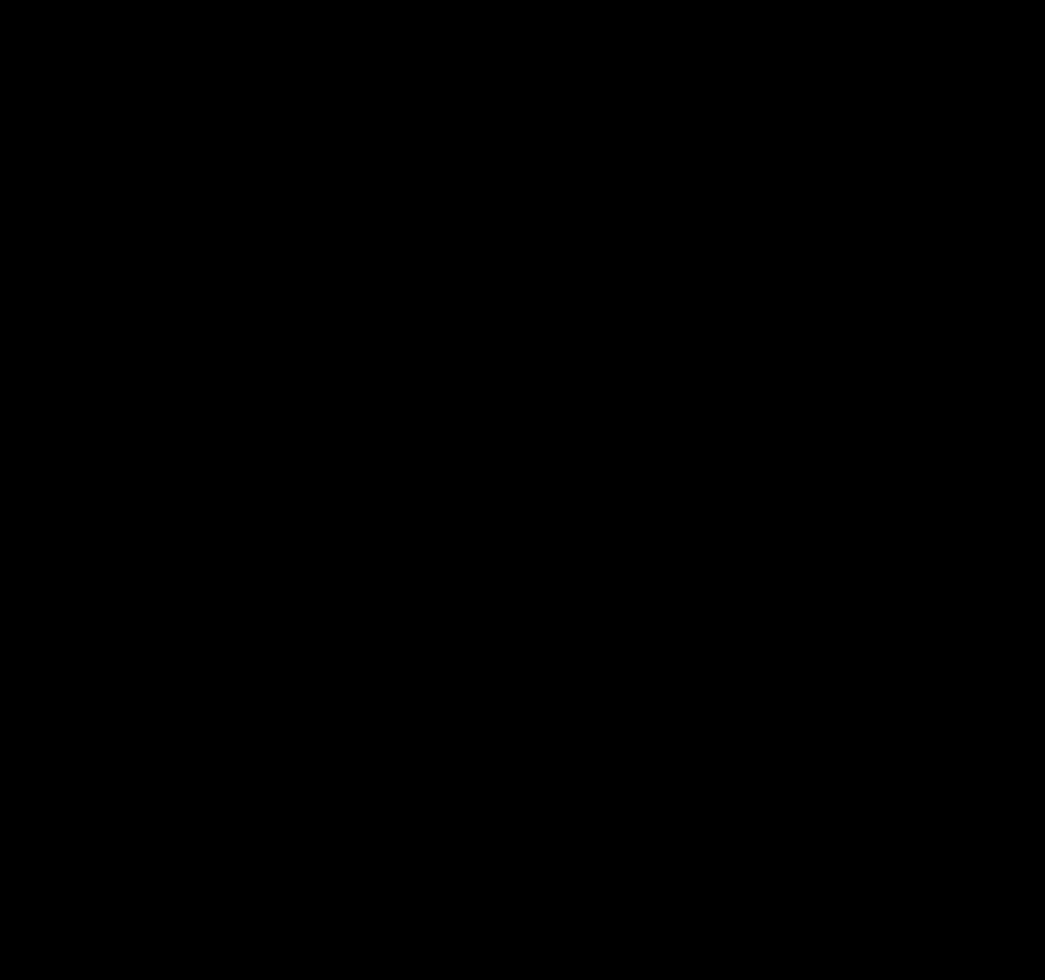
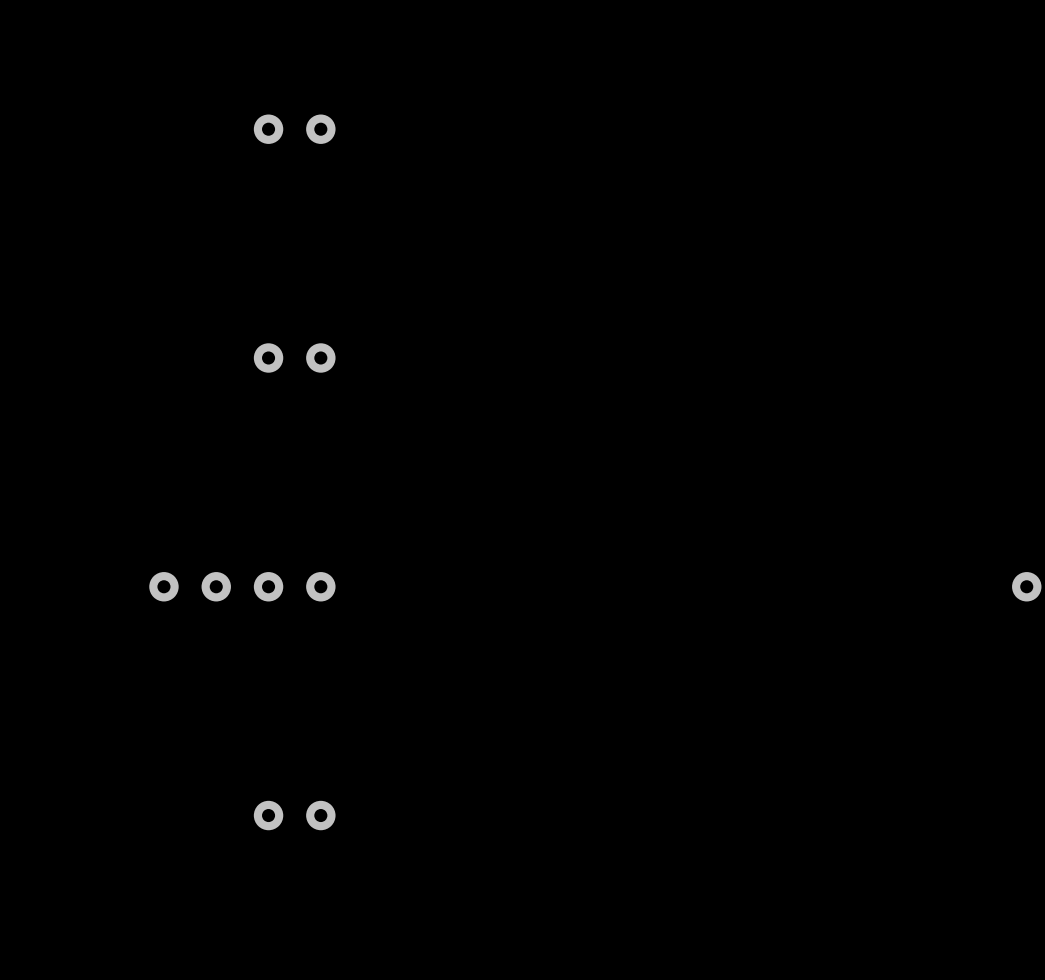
via: none -> (268, 129)
via: none -> (320, 129)
via: none -> (268, 357)
via: none -> (320, 357)
via: none -> (163, 586)
via: none -> (216, 586)
via: none -> (268, 586)
via: none -> (320, 586)
via: none -> (1026, 586)
via: none -> (268, 815)
via: none -> (320, 815)

